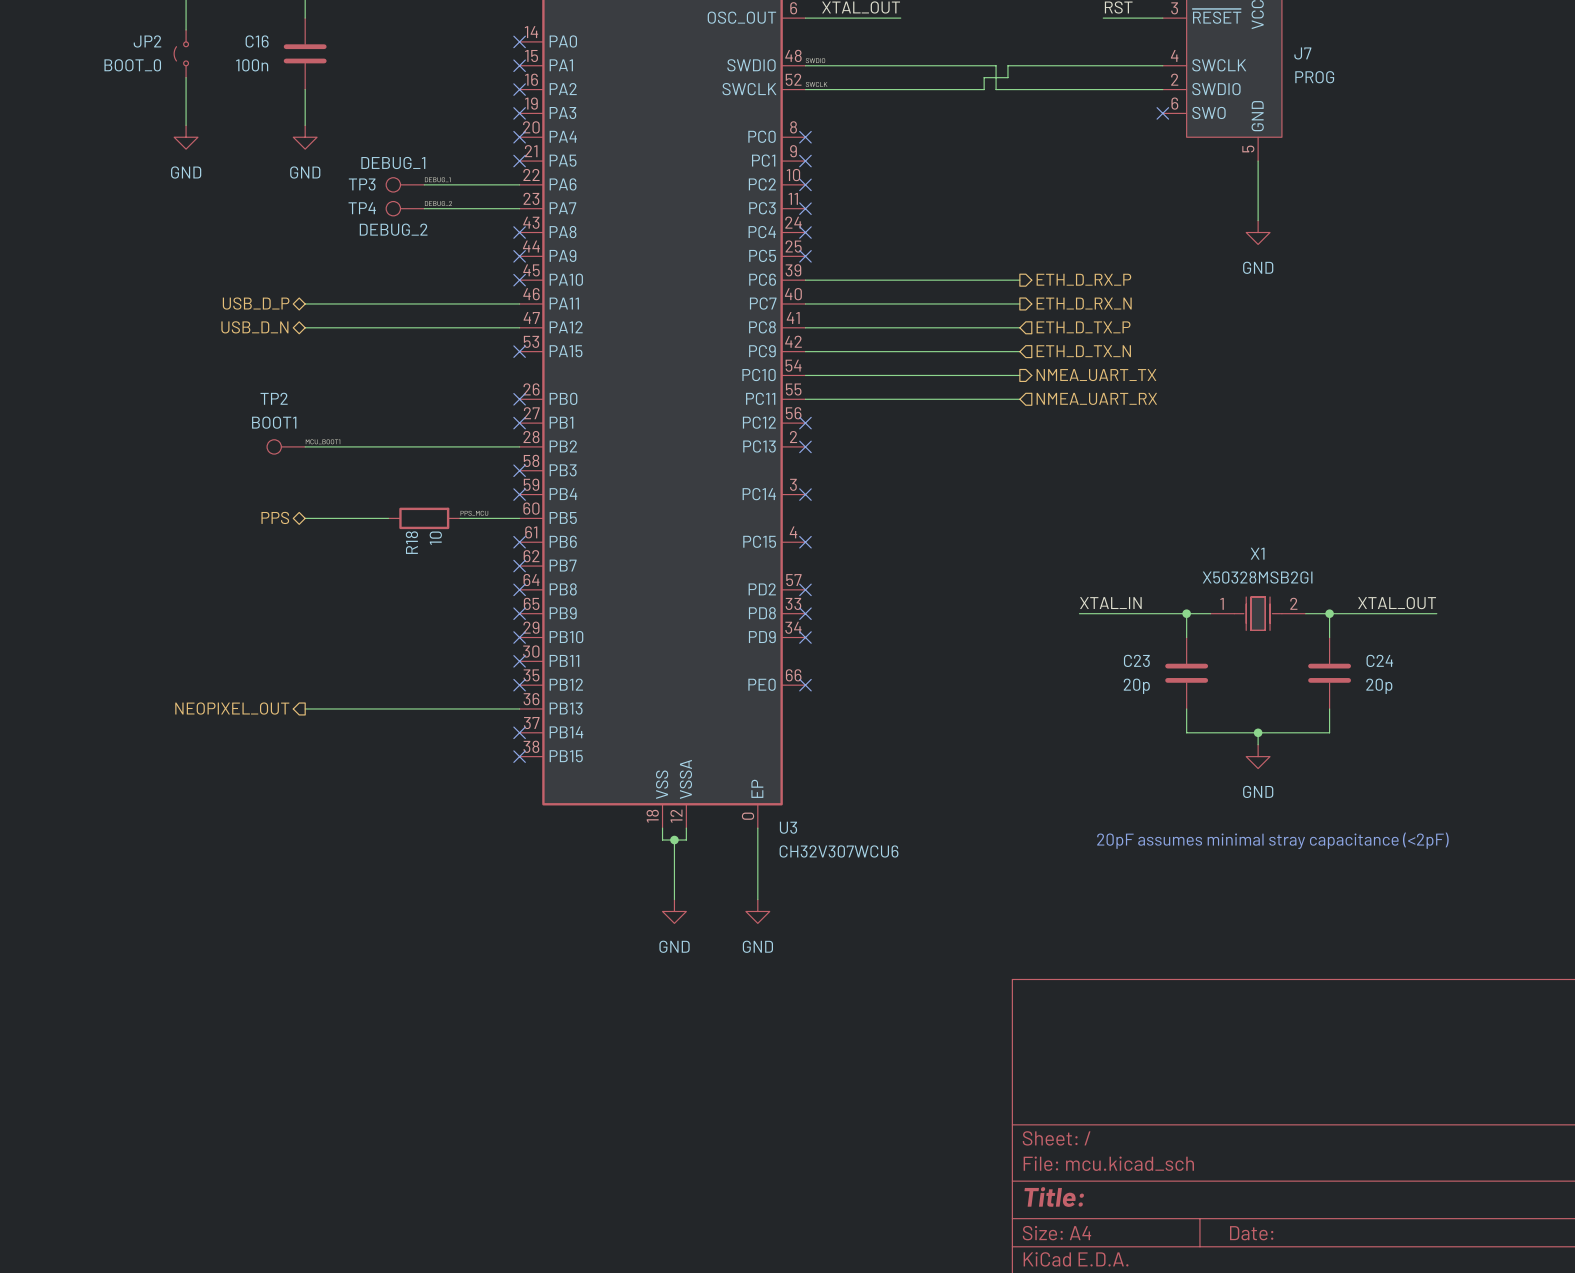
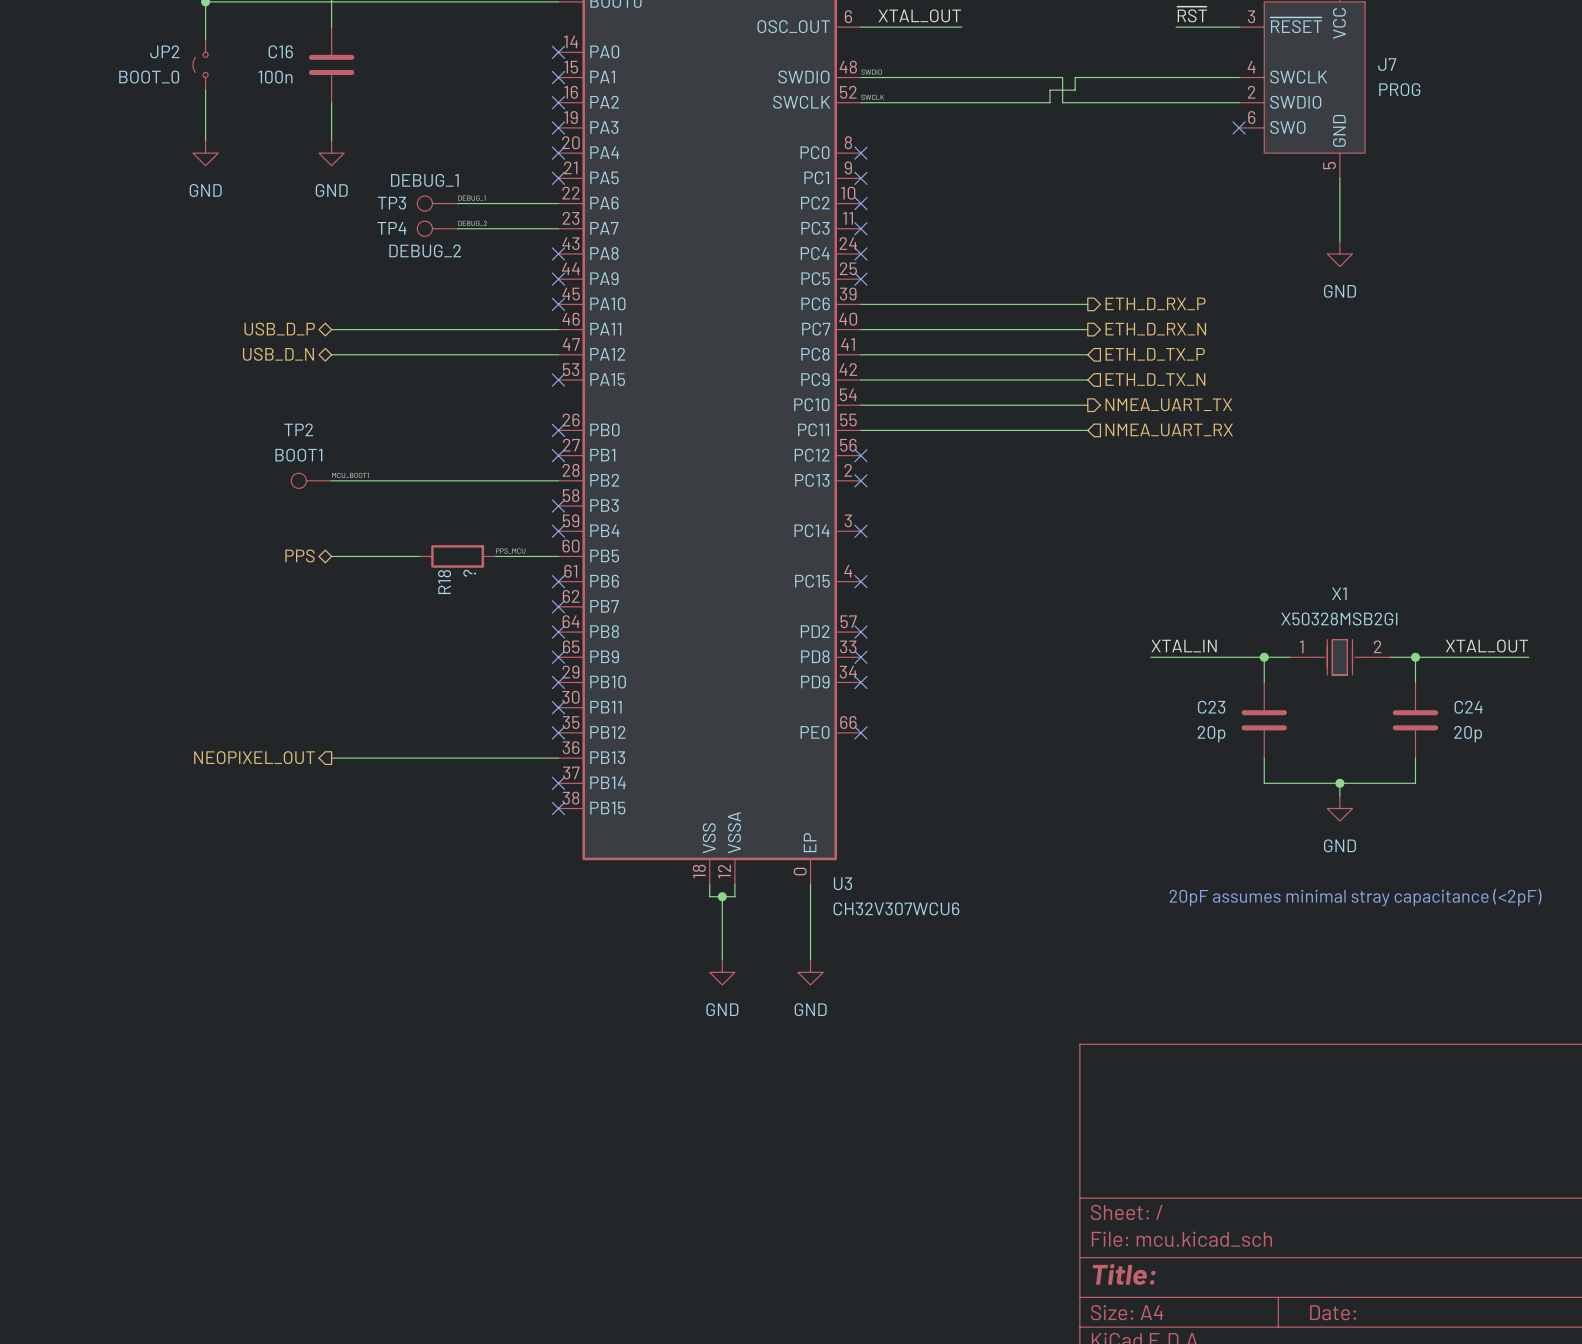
R18 value: 10 (435, 538) -> ? (469, 573)

